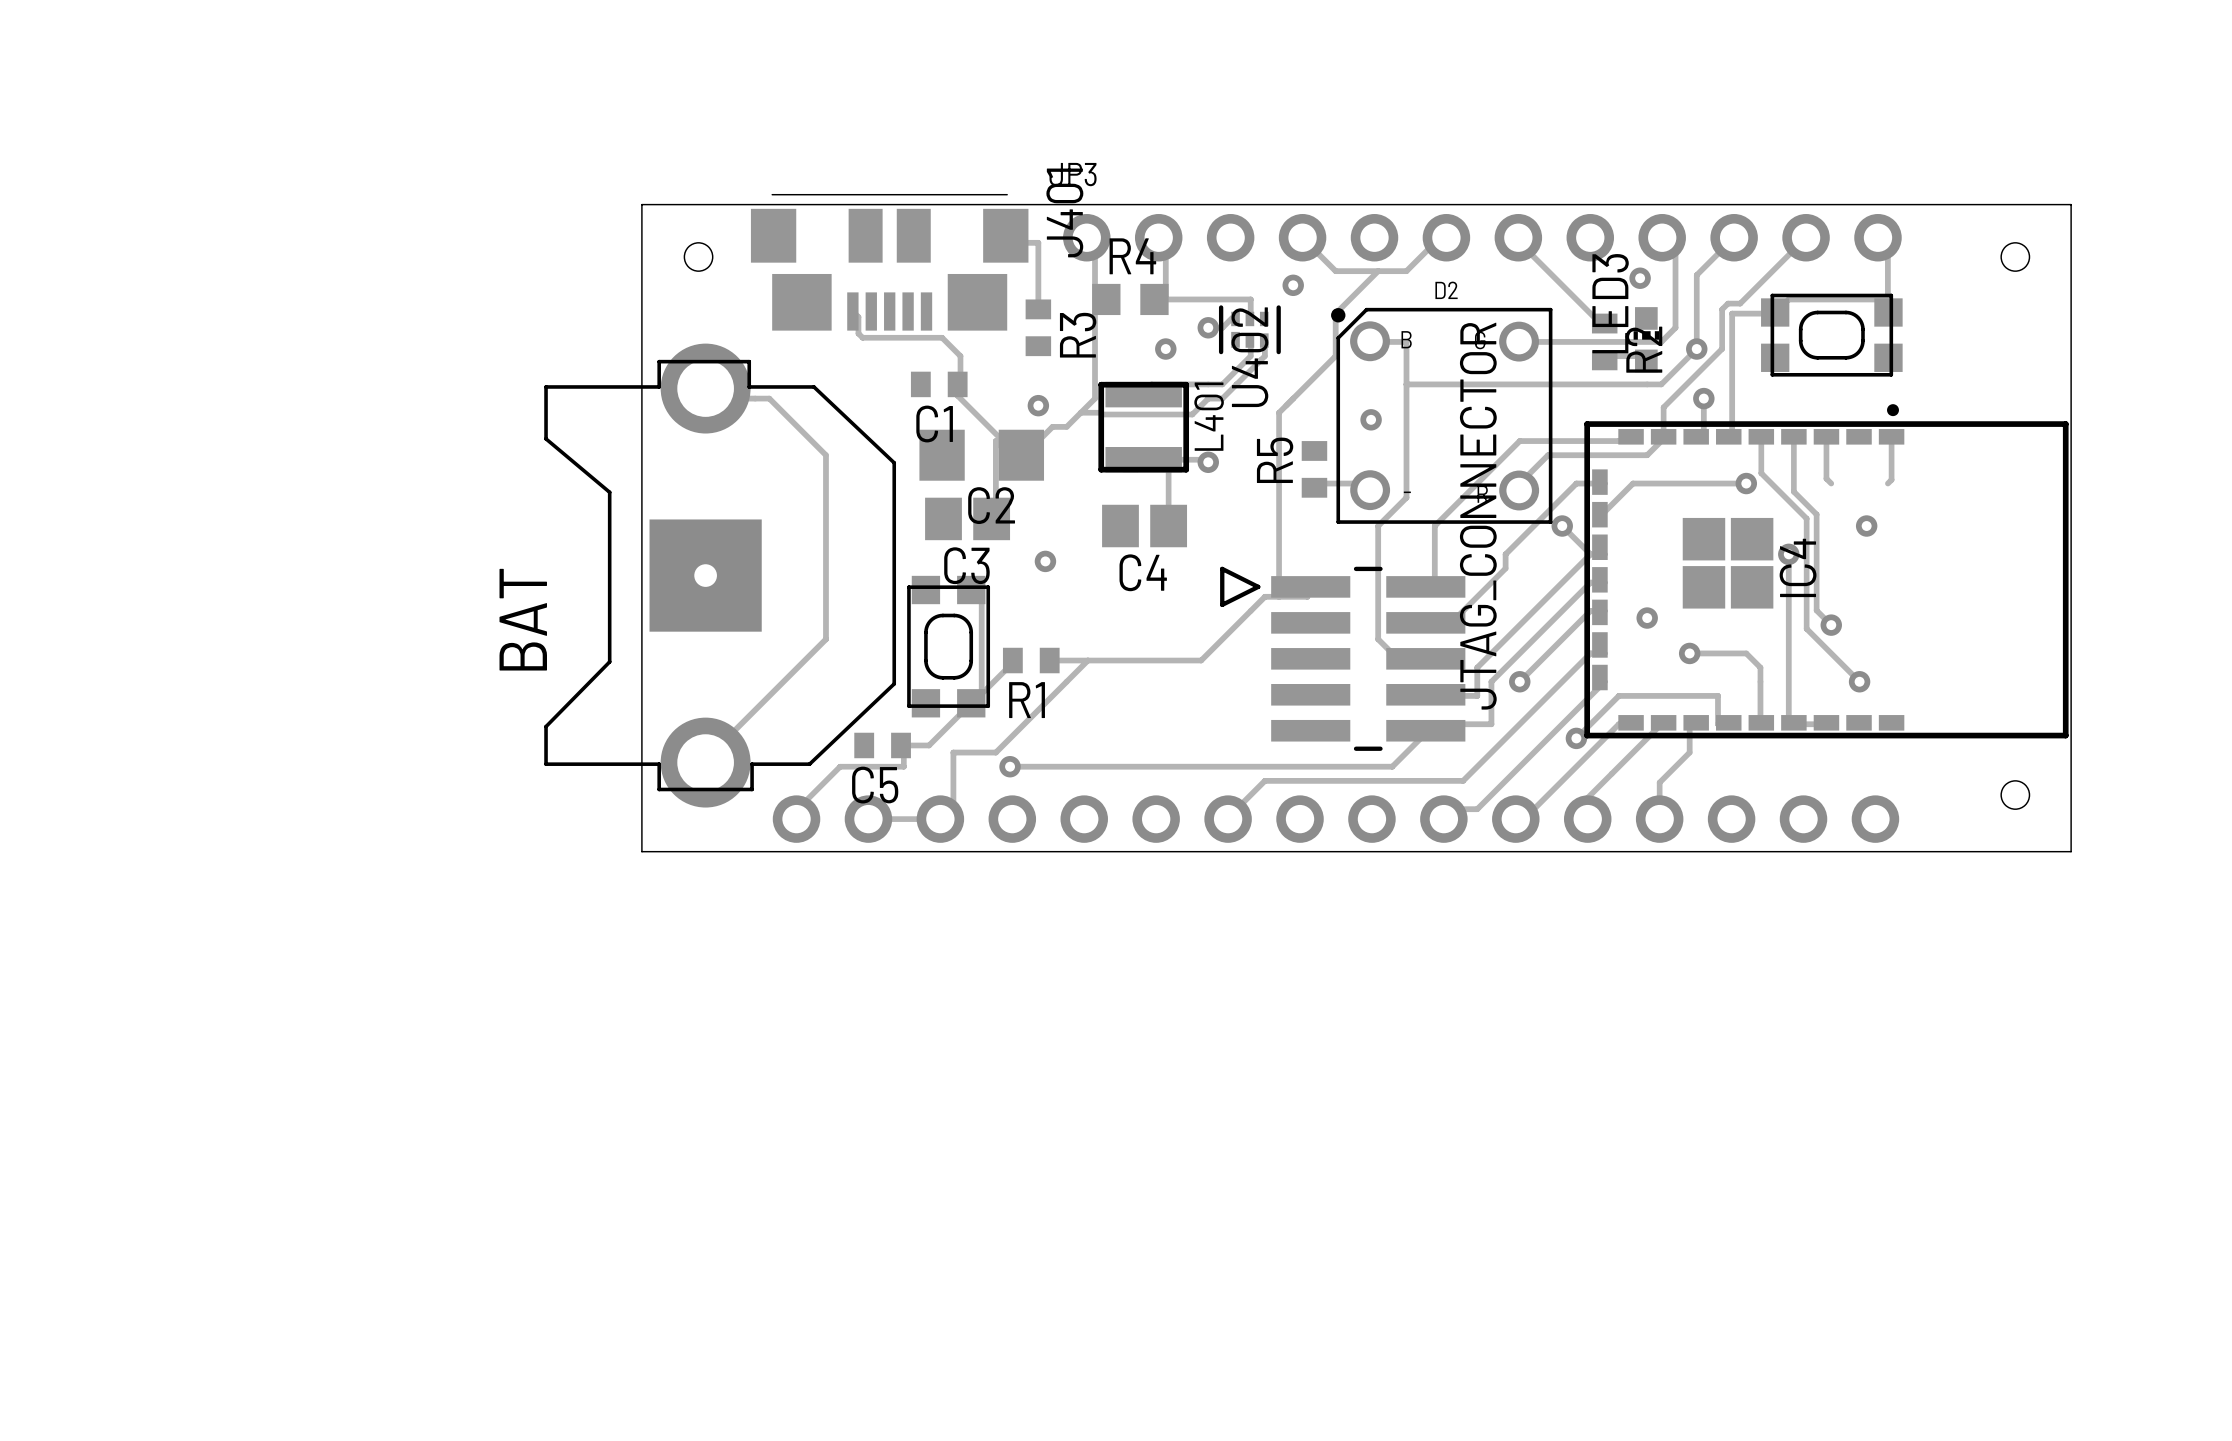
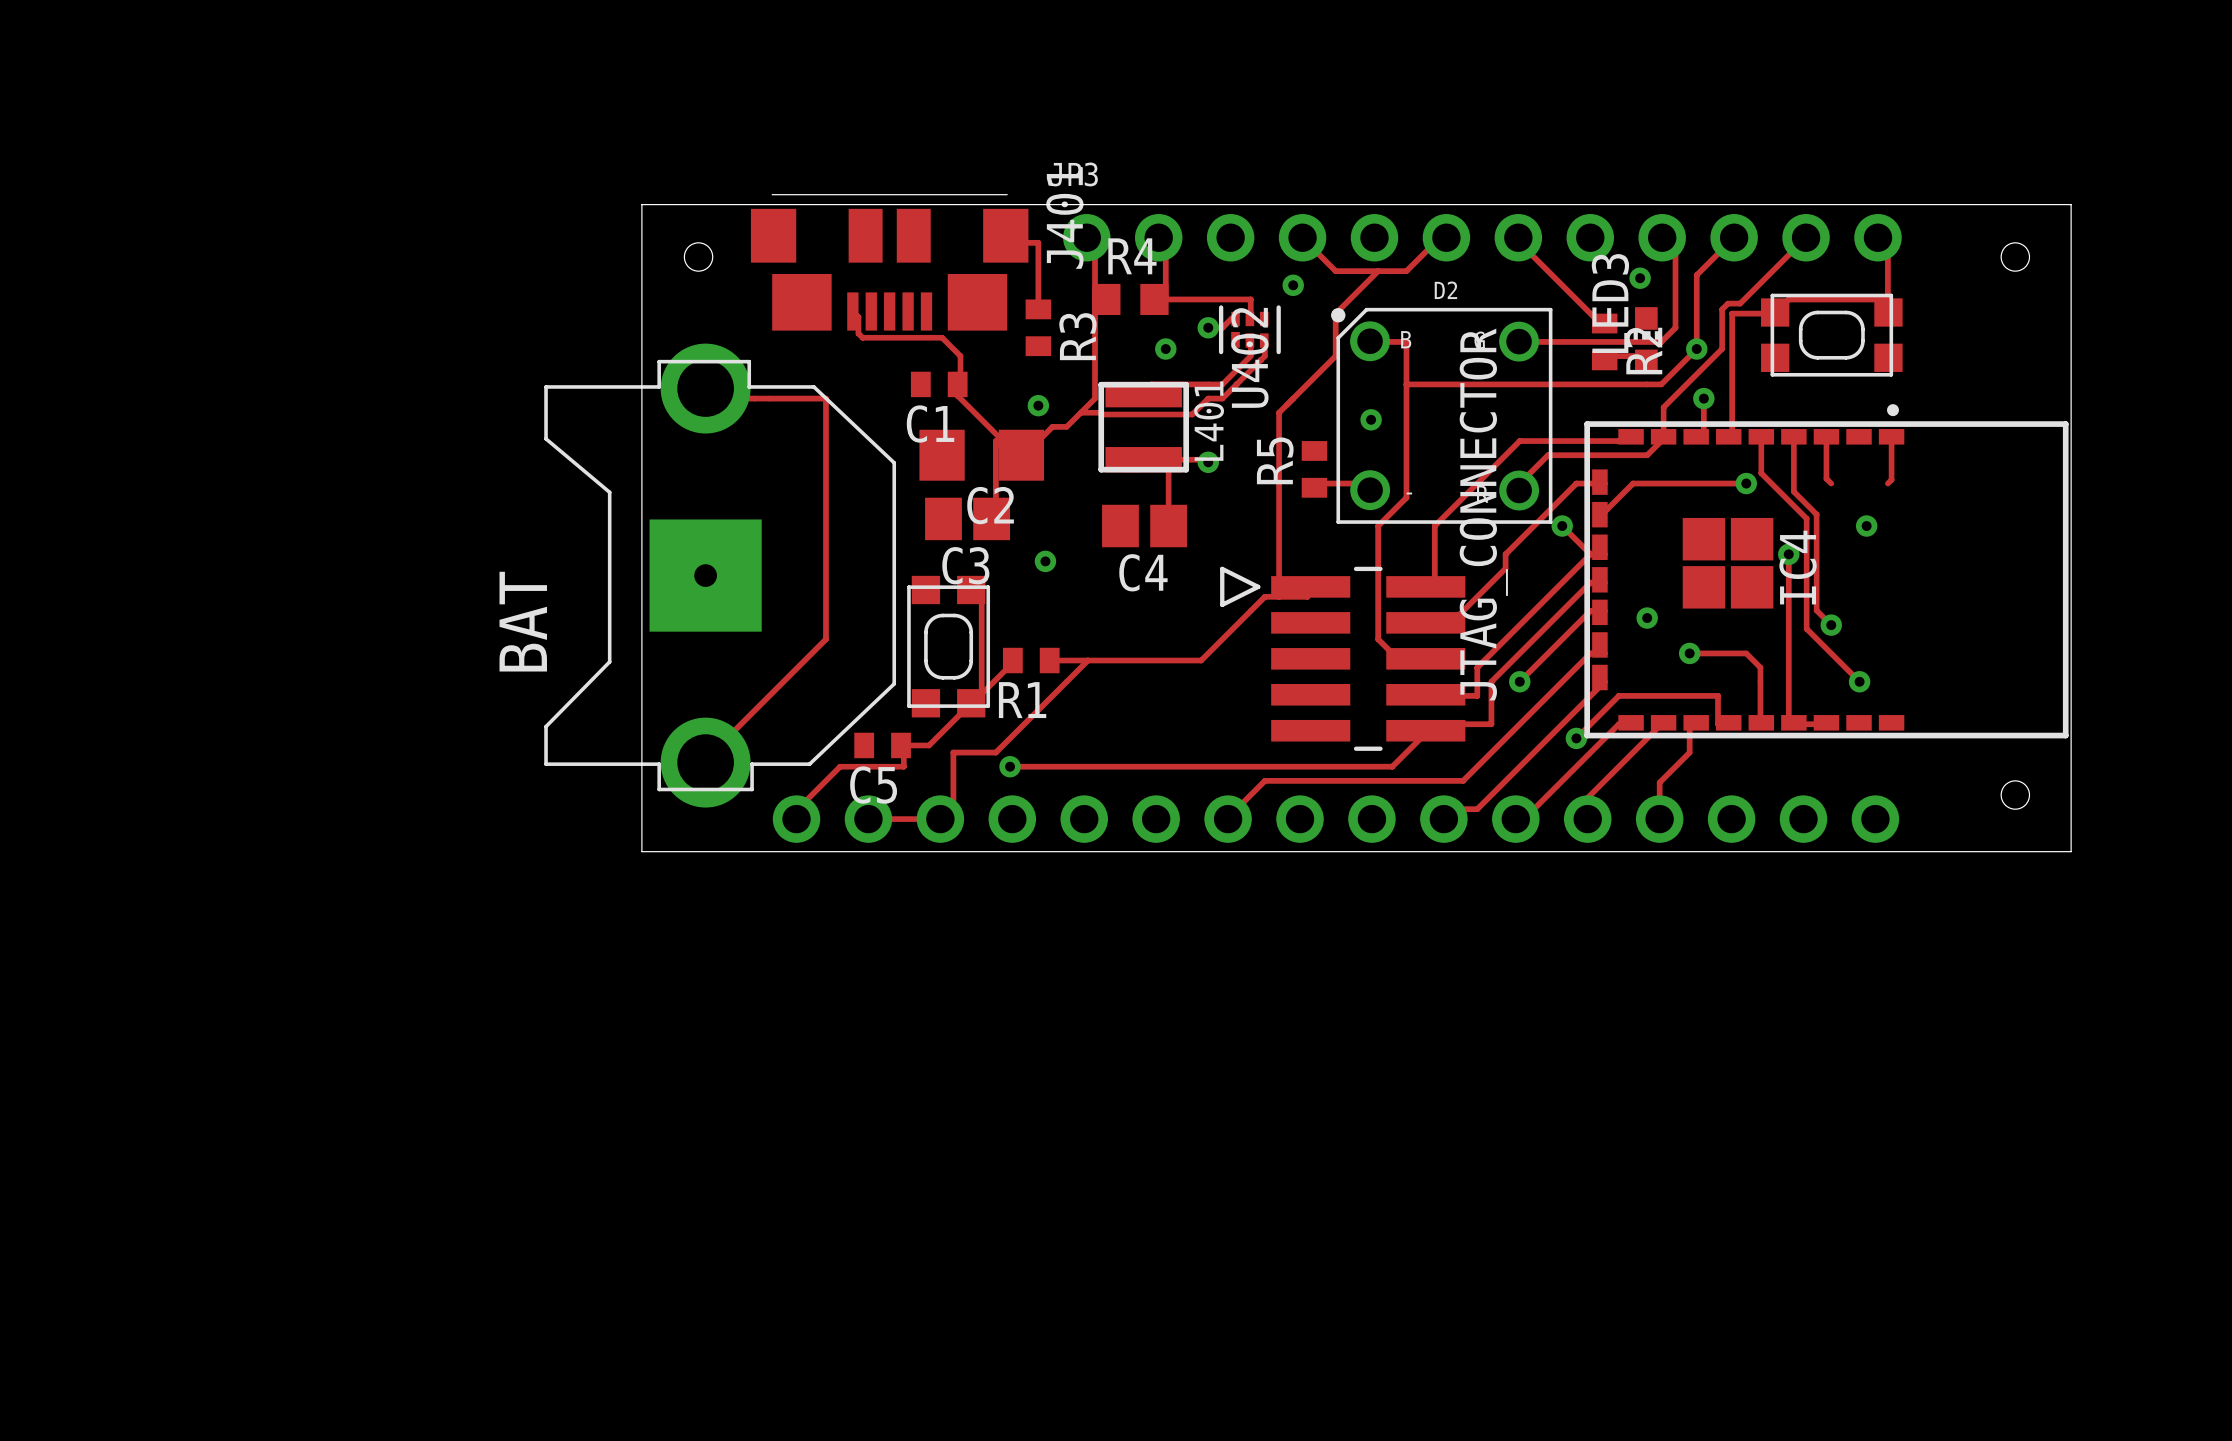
track: (769, 398) (825, 455) -> (769, 398) (825, 398) (825, 455)

